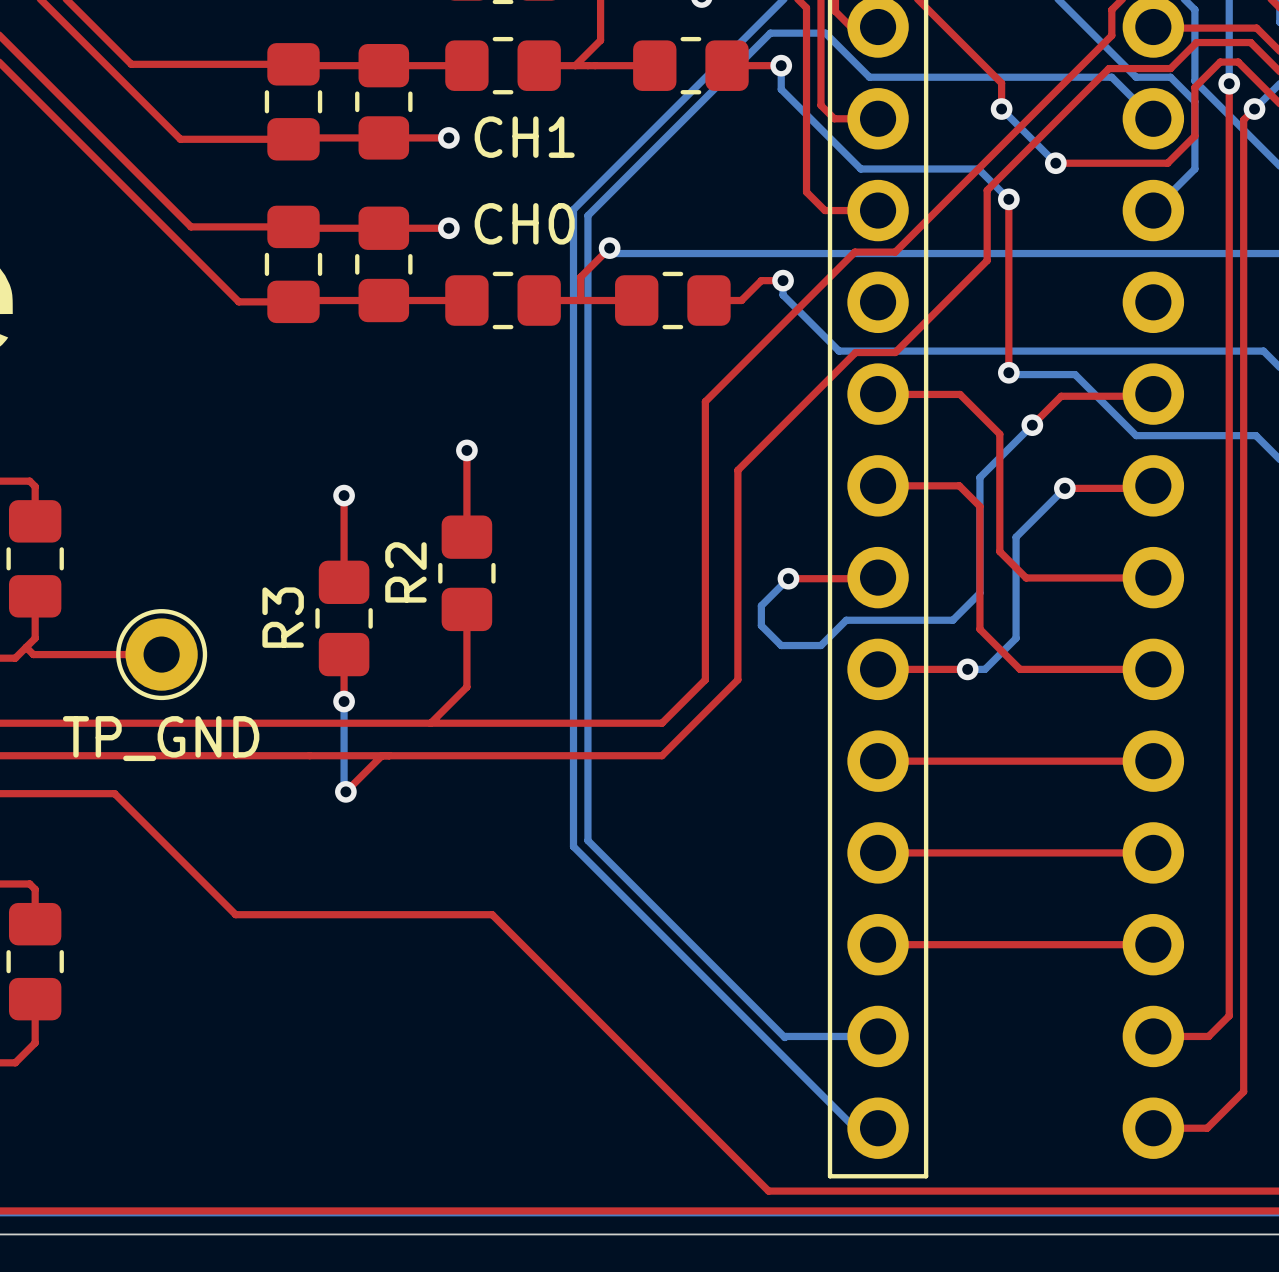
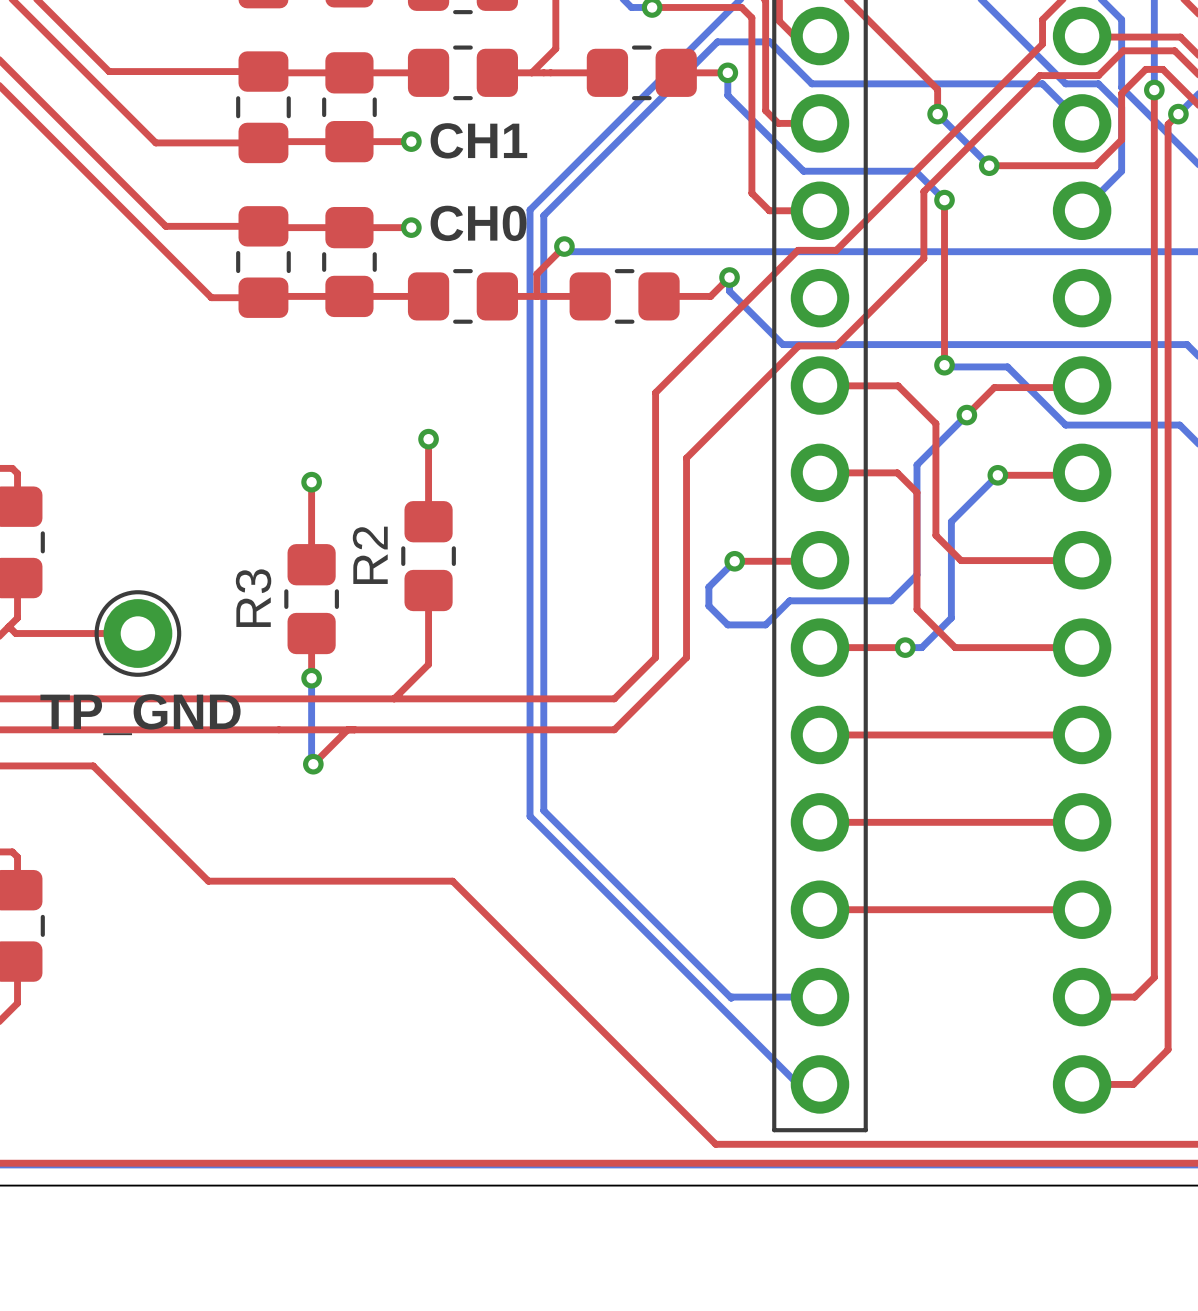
top track: (783, 280) (761, 280) (741, 300) -> (729, 277) (710, 296) (689, 296)

